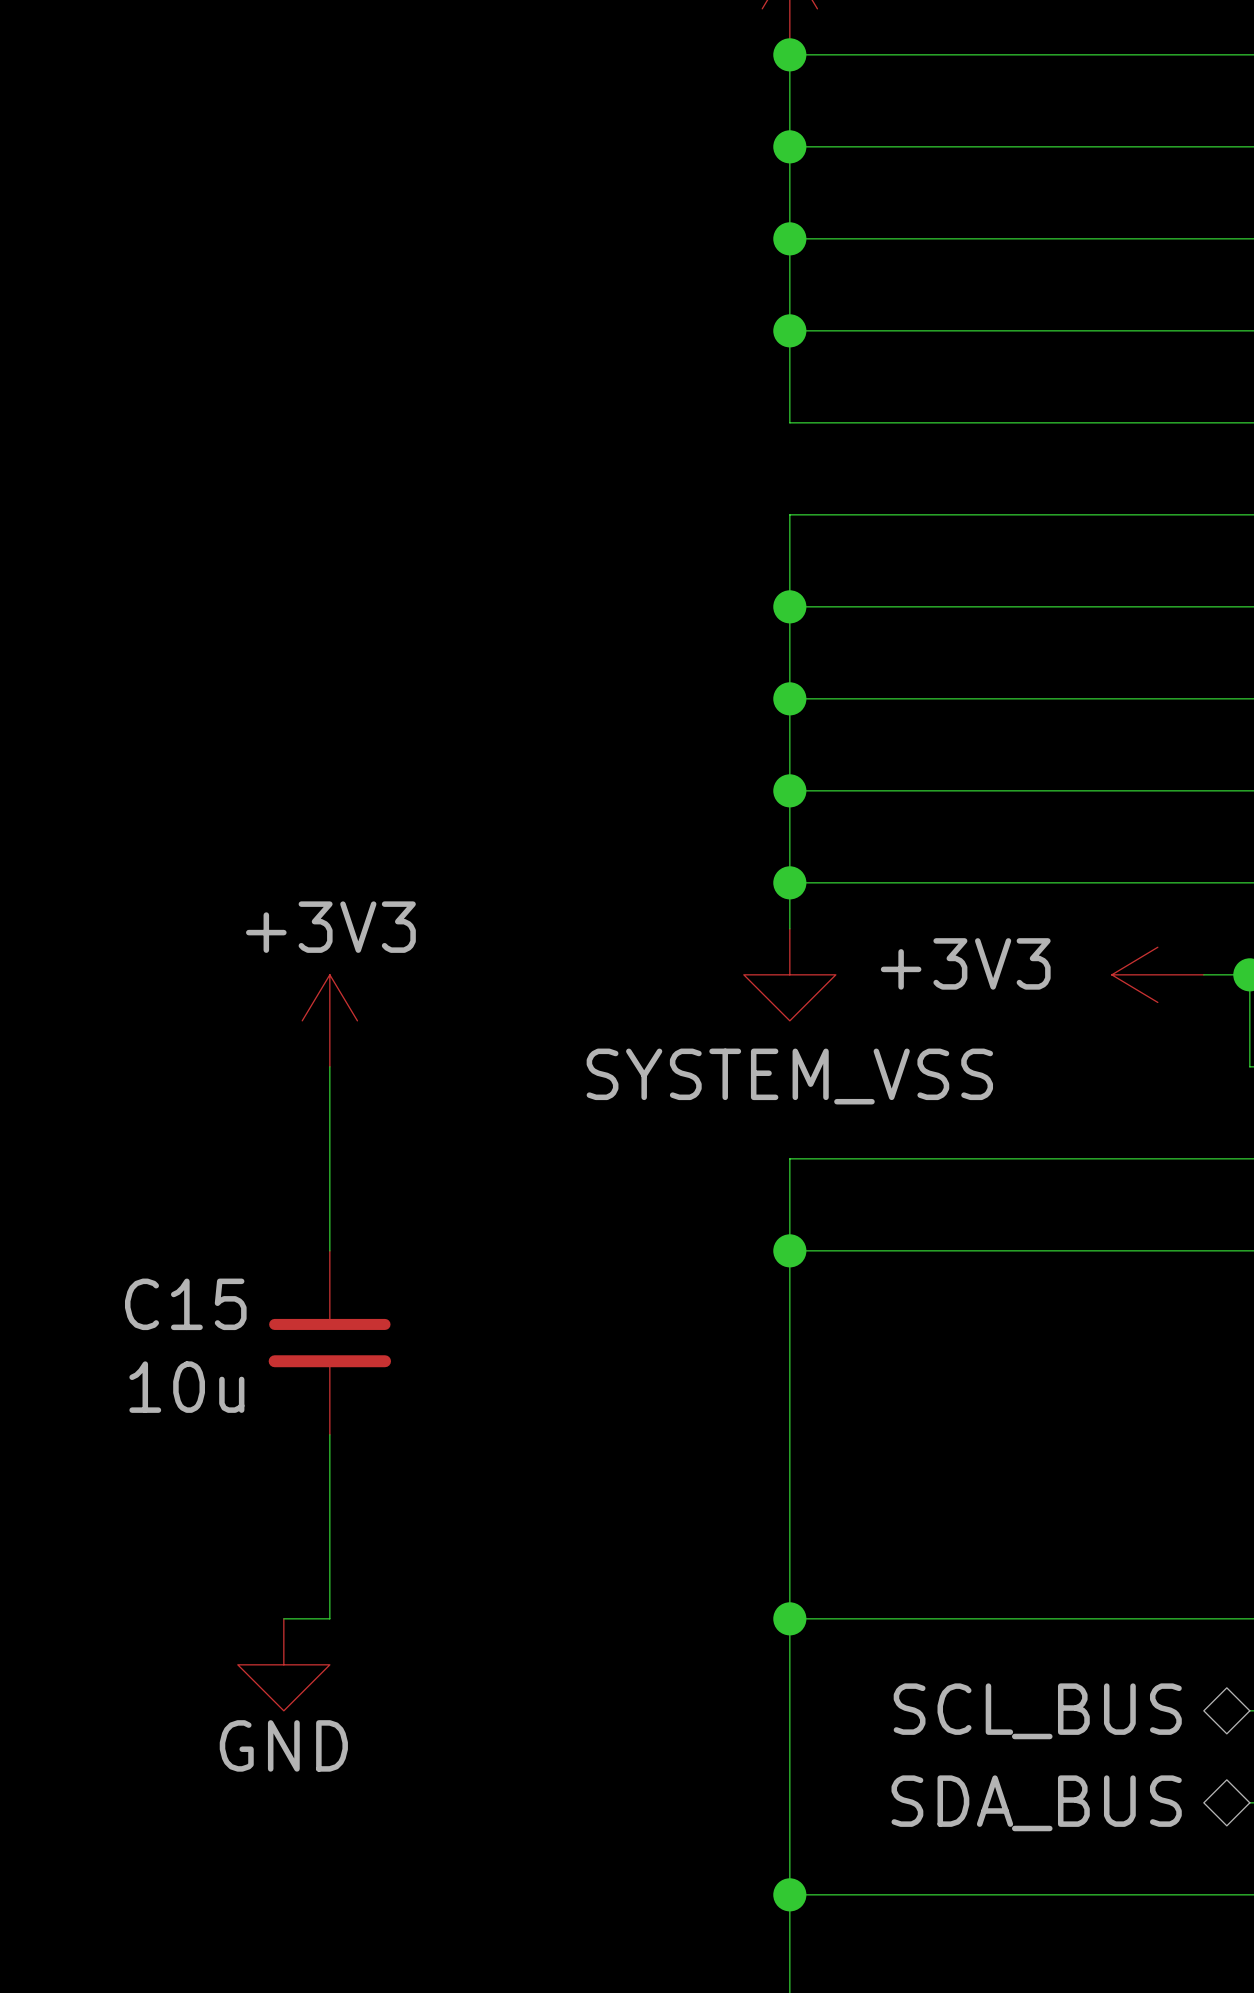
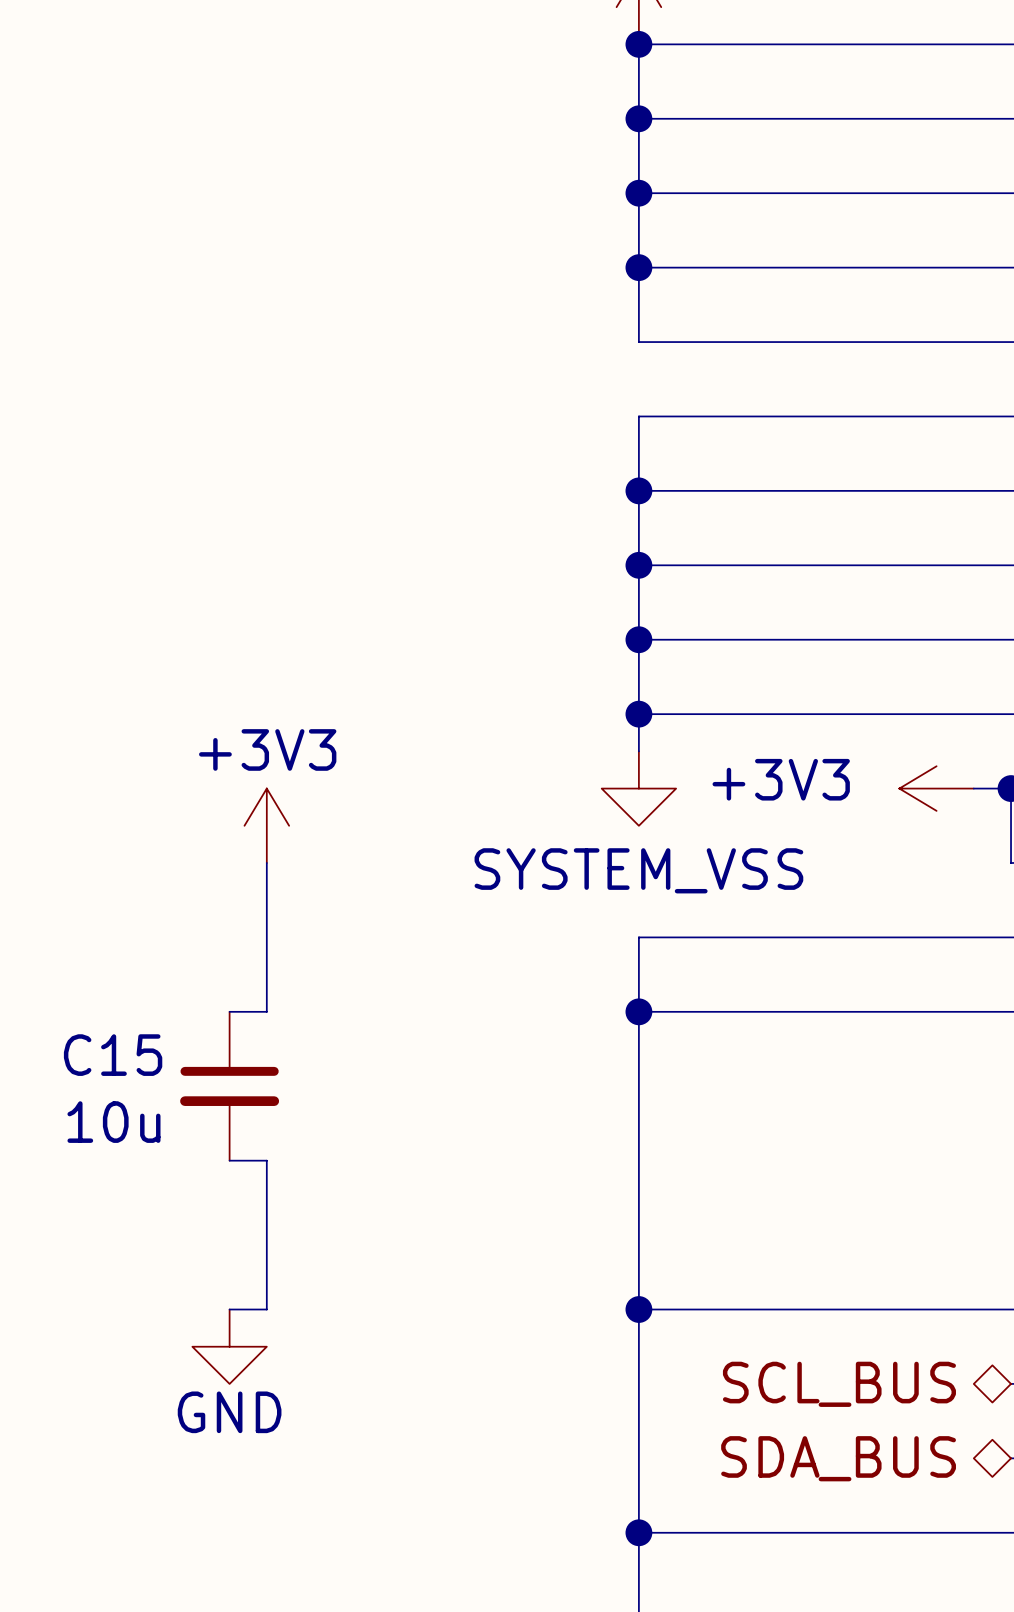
wire: none -> (229, 1011) (266, 1011)
C15 position: (329, 1342) -> (229, 1086)
wire: none -> (229, 1160) (266, 1160)

